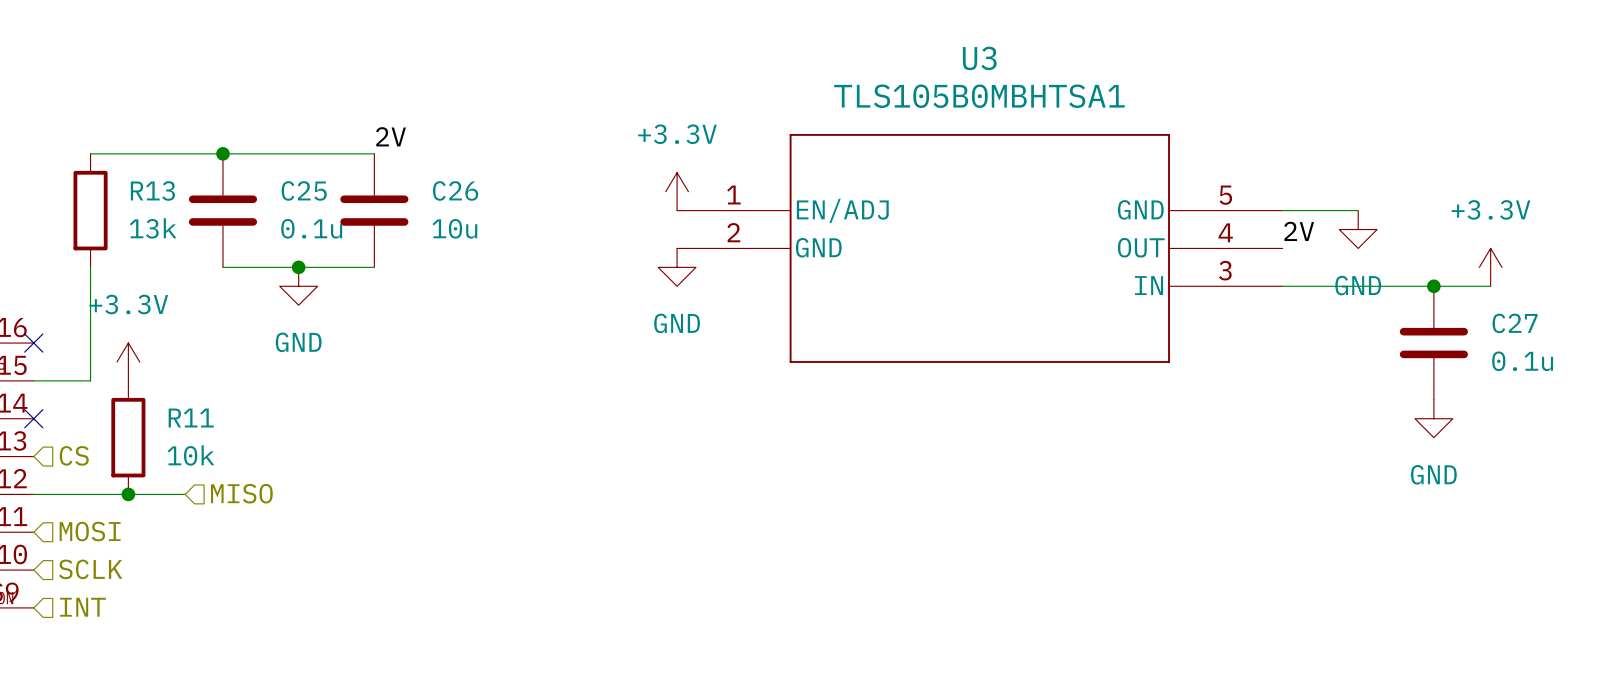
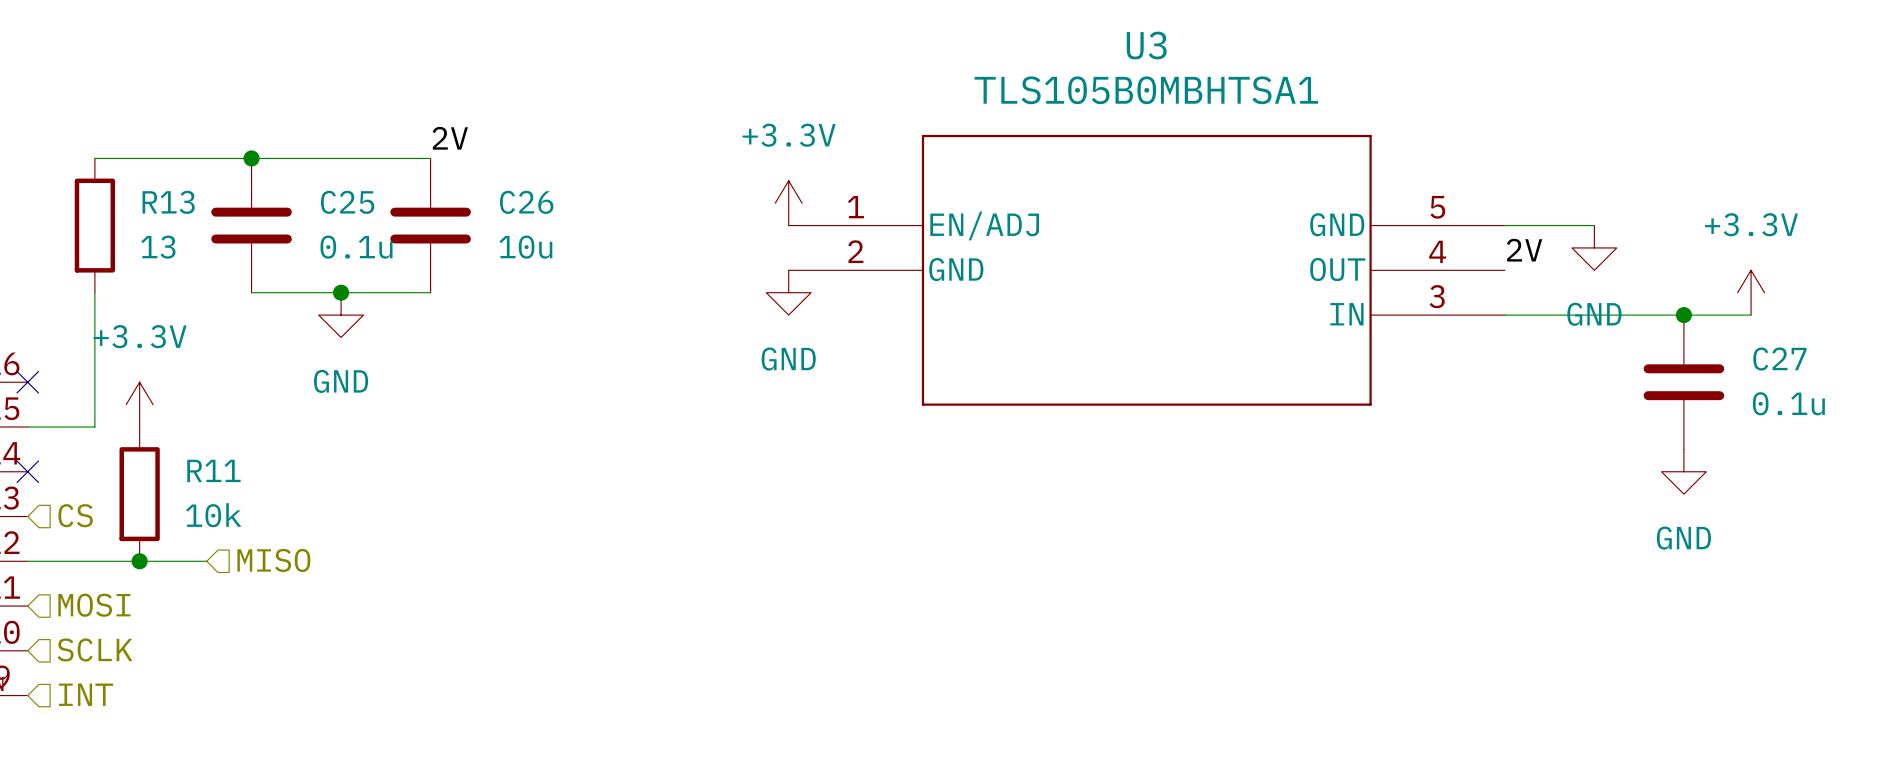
R13 value: 13k (153, 228) -> 13 (158, 247)

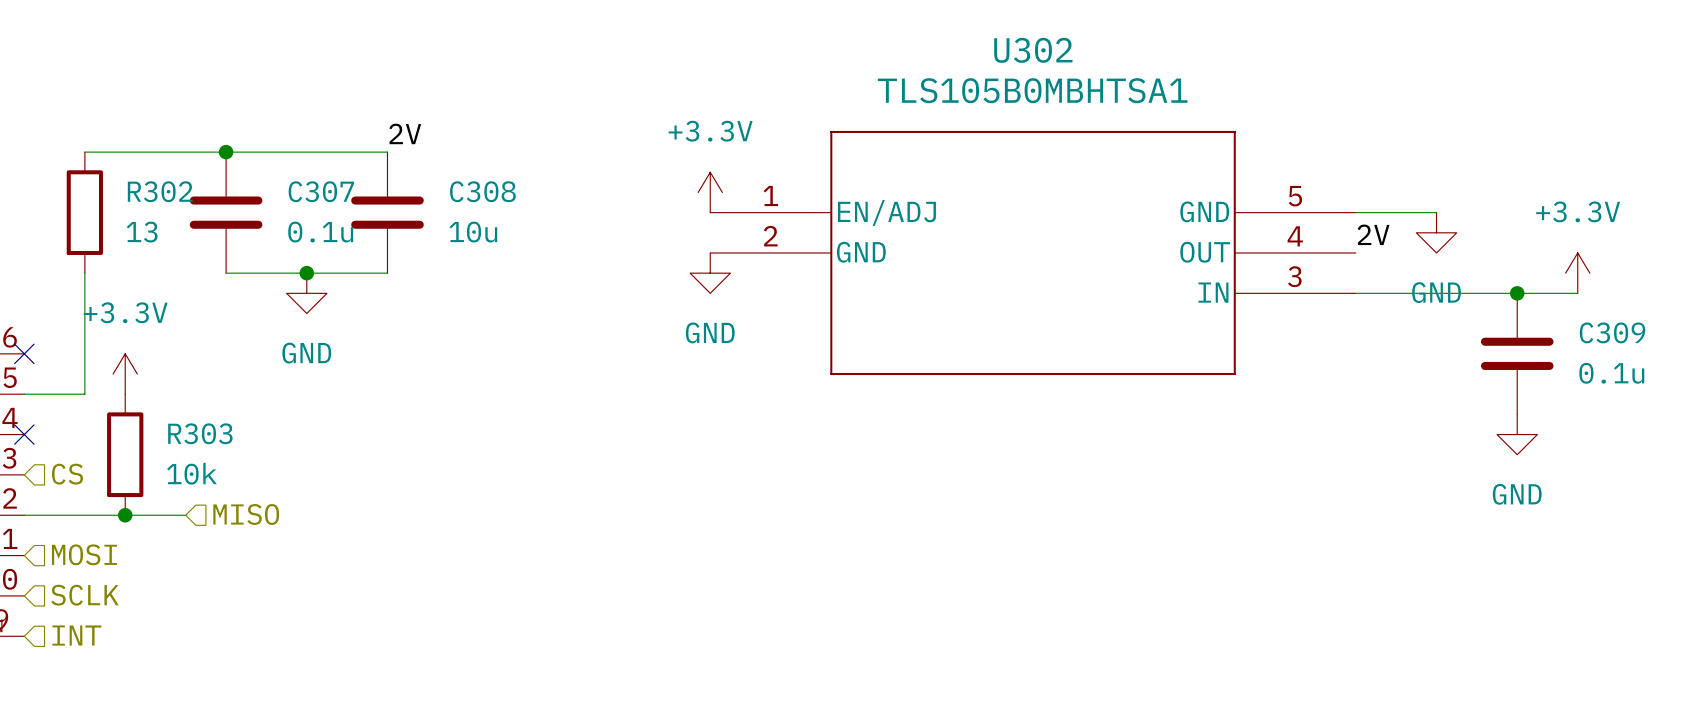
U3 name: U3 (1146, 45) -> U302 (1033, 50)
R13 name: R13 (168, 202) -> R302 (160, 191)
C25 name: C25 (347, 202) -> C307 (321, 191)
C26 name: C26 (526, 202) -> C308 (482, 191)
C27 name: C27 (1779, 359) -> C309 (1612, 332)
R11 name: R11 (213, 470) -> R303 (200, 433)

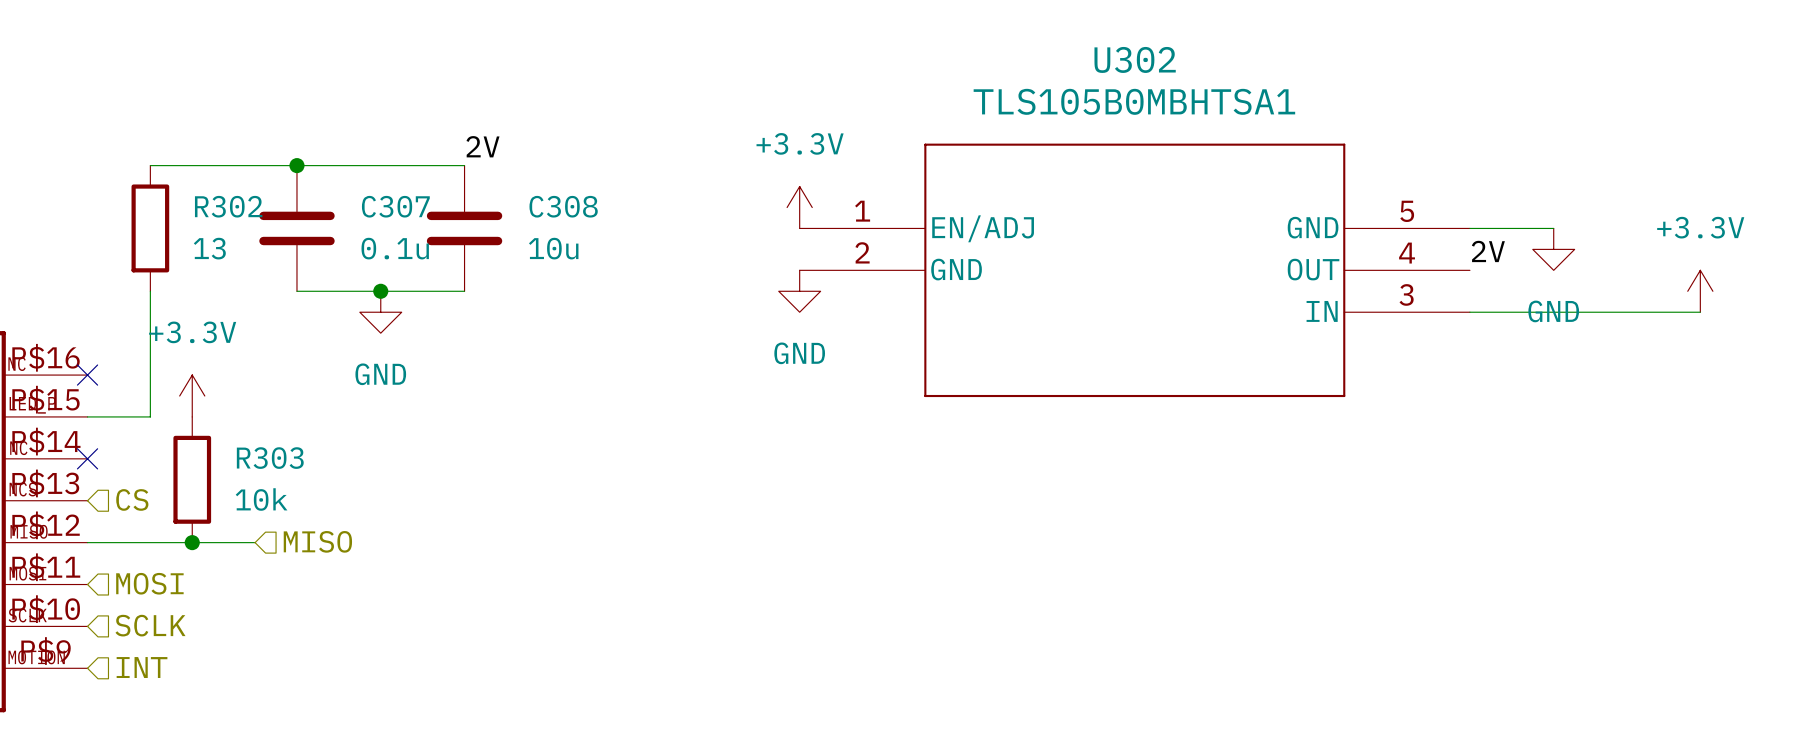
junction: (1517, 293) -> none
C309: 0.1u (1517, 353) -> none
power symbol: GND (1517, 434) -> none

